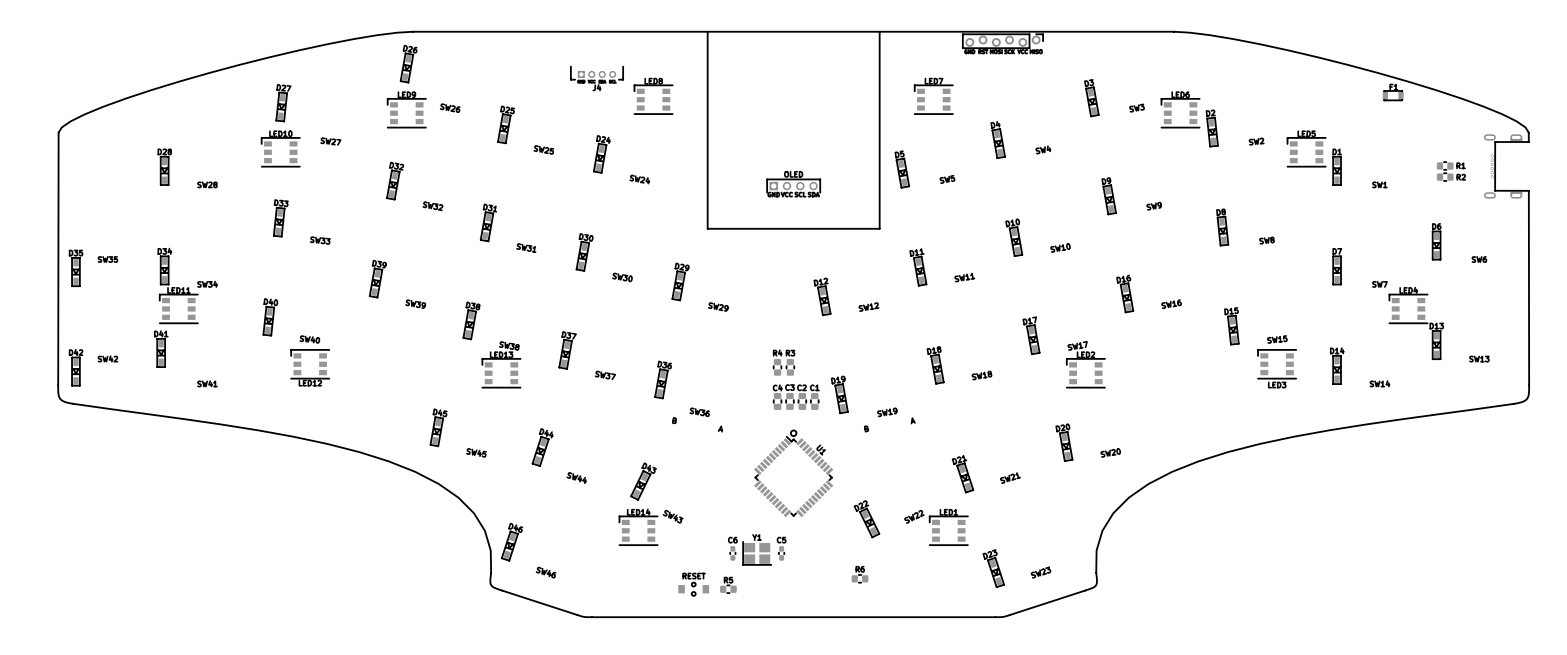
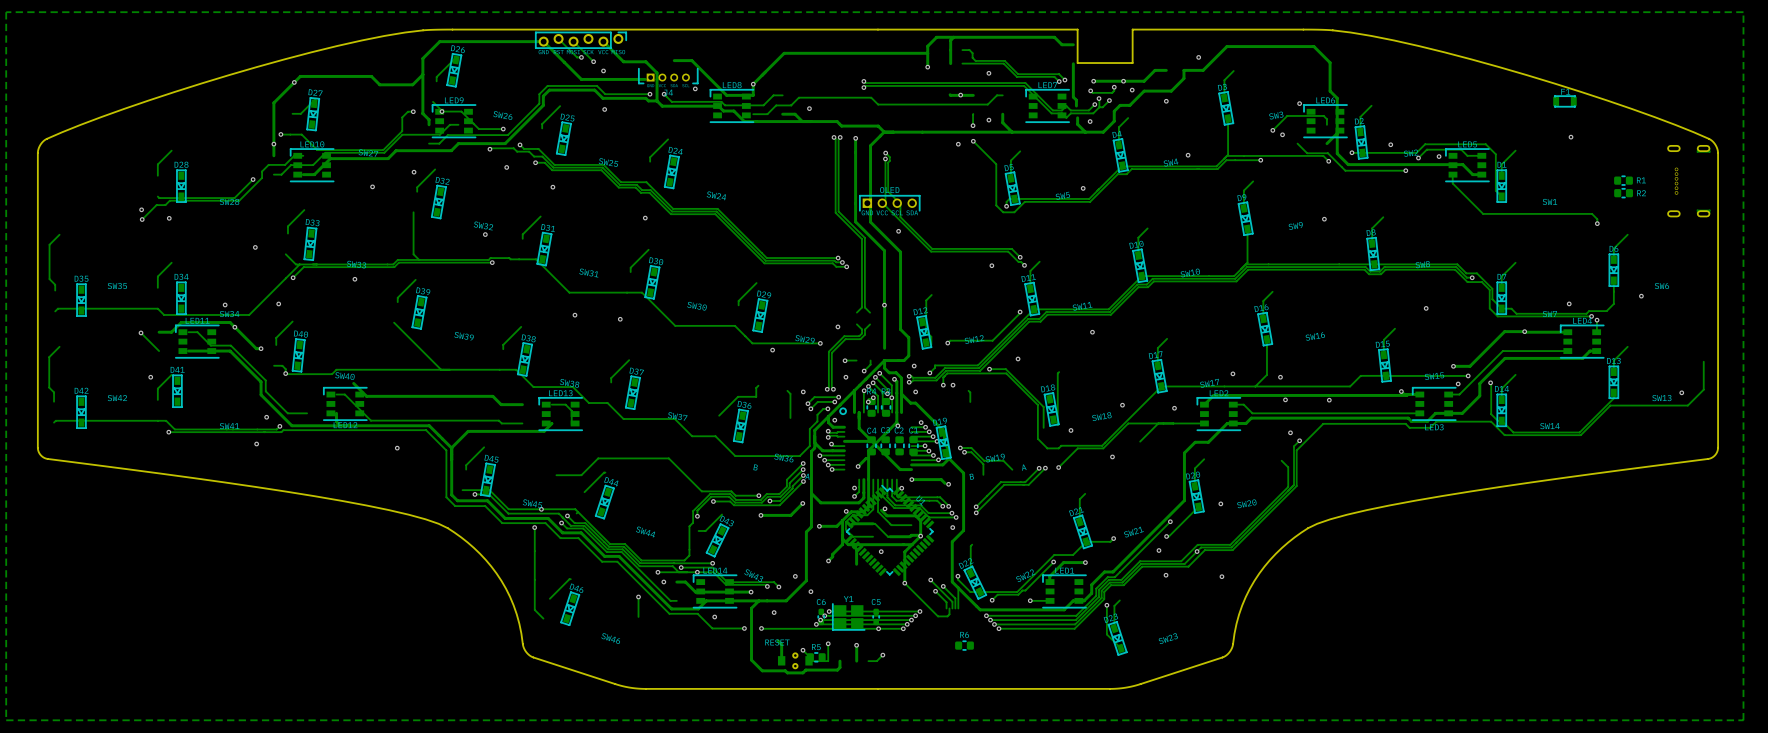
zone outline: none -> (1743, 12) (1743, 720) (6, 720) (6, 12) (1743, 12)
board edge: (879, 31) (879, 228) (707, 228) (707, 31) -> none
board edge: (1174, 31) (413, 31) (377, 35) (299, 50) (151, 89) (85, 114) (61, 127) (58, 132) (58, 396) (63, 401) (70, 403) (293, 436) (359, 452) (415, 471) (438, 483) (458, 497) (474, 513) (484, 530) (490, 550) (490, 582) (492, 586) (580, 616) (590, 617) (1004, 616) (1094, 586) (1096, 582) (1096, 550) (1102, 530) (1113, 513) (1128, 497) (1148, 483) (1171, 471) (1228, 452) (1294, 436) (1513, 403) (1526, 399) (1529, 389) (1528, 190) (1495, 190) (1495, 142) (1528, 142) (1528, 132) (1525, 127) (1516, 121) (1483, 106) (1378, 73) (1259, 44) (1209, 35) (1174, 31) -> (1303, 29) (1332, 30) (1371, 35) (1471, 59) (1607, 100) (1675, 124) (1713, 142) (1718, 153) (1718, 447) (1714, 455) (1708, 458) (1441, 496) (1366, 510) (1317, 523) (1288, 542) (1259, 573) (1242, 605) (1232, 646) (1227, 654) (1131, 686) (1110, 688) (645, 688) (619, 685) (529, 655) (523, 647) (513, 605) (496, 573) (467, 542) (438, 523) (388, 510) (314, 496) (46, 458) (41, 455) (38, 450) (38, 148) (46, 138) (148, 100) (229, 75) (311, 52) (384, 35) (426, 30) (1077, 29) (1077, 63) (1132, 63) (1132, 29) (1303, 29)
track: none -> (953, 37) (950, 40) (950, 63)
track: none -> (558, 38) (577, 57) (581, 57)
part: none -> (581, 40)
part: (1002, 41) -> none
track: none -> (573, 41) (593, 61)
track: none -> (603, 41) (623, 61) (645, 61) (657, 72) (657, 100)
track: none -> (1073, 44) (1061, 44) (1054, 37) (936, 37) (927, 46) (927, 67)
track: none -> (962, 50) (969, 50) (975, 60) (1004, 60) (1018, 74) (1059, 74) (1064, 80)
track: none -> (927, 53) (784, 53) (753, 84) (753, 95) (726, 95) (691, 60) (674, 60)
via: none -> (581, 57)
via: none -> (1198, 57)
track: none -> (454, 59) (436, 77) (436, 81)
via: none -> (593, 61)
track: none -> (962, 63) (1003, 63) (1016, 76) (1054, 76) (1059, 81)
track: none -> (1073, 63) (1073, 97) (1076, 100) (1076, 106)
via: none -> (927, 67)
via: none -> (603, 70)
track: none -> (1166, 70) (1155, 70) (1144, 81) (1093, 81)
track: none -> (1233, 71) (1224, 80) (1224, 98)
via: none -> (988, 73)
track: none -> (422, 74) (412, 84) (379, 84) (371, 76) (300, 76) (273, 102) (273, 155)
track: none -> (645, 79) (581, 79) (543, 41) (439, 41) (422, 58) (422, 113) (429, 119) (429, 124)
via: none -> (1064, 80)
track: none -> (863, 81) (865, 83) (1025, 83) (1052, 110) (1062, 110) (1066, 106) (1070, 110) (1088, 110) (1094, 104)
via: none -> (863, 81)
via: none -> (1093, 81)
via: none -> (1123, 81)
via: none -> (294, 82)
via: none -> (1059, 81)
via: none -> (753, 84)
track: none -> (863, 87) (865, 85) (1024, 85) (1051, 113) (1062, 113) (1066, 117) (1070, 113) (1093, 113) (1099, 107)
via: none -> (863, 87)
track: none -> (1114, 87) (1112, 92) (1092, 92) (1090, 90)
via: none -> (1114, 87)
via: none -> (695, 88)
via: none -> (1132, 90)
via: none -> (1090, 90)
track: none -> (650, 94) (605, 94) (597, 85) (547, 85) (539, 94) (539, 103) (507, 135) (447, 135) (439, 143) (429, 143)
via: none -> (650, 94)
track: none -> (664, 94) (671, 101) (721, 101) (725, 105) (763, 105) (773, 95) (782, 95)
via: none -> (664, 94)
track: none -> (950, 94) (973, 95)
via: none -> (960, 95)
track: none -> (1002, 95) (997, 95) (987, 104) (878, 104) (871, 97) (798, 97) (791, 105) (776, 105) (767, 114) (753, 114)
track: none -> (316, 98) (300, 113) (292, 113)
track: none -> (1099, 98) (1099, 107)
via: none -> (1099, 98)
track: none -> (1109, 100) (1102, 107) (1099, 107)
via: none -> (1109, 100)
track: none -> (657, 100) (662, 106) (718, 106) (723, 111) (733, 111) (744, 121) (837, 121) (841, 126) (878, 126) (884, 132)
track: none -> (657, 100) (648, 100) (645, 98) (602, 98) (594, 90) (549, 90) (543, 96) (543, 105) (505, 143) (458, 143) (451, 150) (396, 150) (388, 158) (330, 158) (314, 174) (303, 174)
via: none -> (1166, 101)
track: none -> (433, 101) (441, 111) (461, 111) (478, 129) (503, 129)
via: none -> (1299, 103)
via: none -> (1094, 104)
track: none -> (560, 106) (542, 124) (542, 128)
track: none -> (1371, 105) (1360, 116) (1360, 132)
via: none -> (604, 109)
via: none -> (809, 108)
track: none -> (413, 111) (407, 111) (402, 117) (402, 131) (383, 150) (317, 150) (301, 134) (280, 134)
via: none -> (413, 111)
via: none -> (441, 111)
track: none -> (782, 114) (795, 114) (802, 121)
track: none -> (973, 114) (973, 125)
track: none -> (1002, 114) (1002, 122) (1012, 132)
track: none -> (1077, 117) (1077, 124) (1085, 132)
track: none -> (1128, 118) (1118, 127) (1118, 145)
track: none -> (1228, 118) (1228, 154) (1216, 166) (1122, 165) (1089, 198) (1009, 198) (1006, 201) (1006, 206)
via: none -> (988, 120)
via: none -> (1090, 121)
track: none -> (458, 124) (449, 124) (439, 134) (402, 134) (384, 152) (325, 152) (313, 165) (291, 165) (281, 174) (273, 174)
track: none -> (1326, 124) (1326, 119) (1323, 115) (1287, 115) (1272, 130)
via: none -> (973, 125)
via: none -> (503, 129)
via: none -> (1272, 130)
track: none -> (1337, 133) (1326, 143)
via: none -> (280, 134)
via: none -> (1282, 134)
track: none -> (834, 137) (835, 139) (835, 212) (861, 239) (861, 307) (856, 312)
via: none -> (834, 137)
track: none -> (840, 137) (838, 139) (838, 211) (864, 237) (864, 307) (870, 312)
via: none -> (840, 137)
via: none -> (1571, 137)
track: none -> (855, 138) (855, 221) (884, 250) (884, 348)
via: none -> (855, 138)
track: none -> (668, 139) (650, 157) (650, 161)
track: none -> (973, 141) (996, 164) (996, 205) (1003, 212) (1014, 212) (1024, 201) (1090, 201) (1117, 174) (1126, 174) (1131, 169) (1217, 169) (1226, 160) (1260, 160)
via: none -> (973, 141)
via: none -> (273, 144)
via: none -> (958, 144)
track: none -> (1297, 143) (1307, 153) (1327, 153) (1345, 170) (1405, 170)
track: none -> (520, 144) (524, 148) (538, 148) (554, 164) (603, 164) (621, 182) (646, 182) (673, 208) (717, 208) (766, 258) (838, 258)
via: none -> (520, 144)
via: none -> (1390, 144)
track: none -> (489, 149) (513, 148) (517, 151) (529, 151) (534, 156) (542, 156) (553, 167) (602, 167) (619, 184) (636, 184) (642, 190) (650, 190) (672, 211) (716, 211) (765, 260) (834, 260) (842, 262)
via: none -> (489, 149)
track: none -> (171, 150) (157, 164) (157, 175)
track: none -> (1020, 151) (1010, 160) (1010, 178)
track: none -> (1515, 150) (1501, 164) (1501, 175)
track: none -> (885, 153) (889, 157) (888, 191) (900, 203) (900, 217) (932, 248) (1011, 248) (1020, 257)
via: none -> (885, 153)
track: none -> (1351, 152) (1416, 152) (1425, 144) (1485, 144) (1495, 154) (1495, 190) (1501, 196)
via: none -> (1351, 152)
track: none -> (303, 155) (294, 155) (285, 164) (268, 164) (262, 171) (262, 177) (239, 200) (169, 200) (165, 205) (156, 205) (142, 219)
via: none -> (1188, 155)
track: none -> (1482, 155) (1467, 155) (1461, 149) (1426, 149) (1418, 158)
track: none -> (1226, 155) (1323, 155) (1328, 161)
via: none -> (1439, 156)
via: none -> (1418, 158)
track: none -> (885, 158) (885, 205) (931, 251) (1008, 251) (1024, 265)
via: none -> (885, 158)
via: none -> (1260, 160)
via: none -> (1328, 161)
track: none -> (535, 162) (544, 162) (552, 170) (601, 170) (618, 187) (635, 187) (640, 192) (649, 192) (670, 214) (715, 214) (764, 263) (832, 263) (836, 266) (846, 266)
via: none -> (535, 162)
via: none -> (506, 167)
track: none -> (435, 169) (417, 187) (417, 191)
via: none -> (1405, 170)
via: none -> (414, 172)
track: none -> (1452, 174) (1452, 183) (1483, 213) (1592, 213) (1597, 219) (1597, 223)
track: none -> (1482, 174) (1472, 174) (1462, 164) (1348, 164) (1337, 153) (1337, 98) (1330, 91) (1330, 62) (1313, 46) (1226, 46) (1203, 70) (1183, 70) (1183, 78) (1171, 91) (1144, 91) (1129, 105) (1120, 105) (1114, 111) (1114, 121) (1103, 132) (884, 132) (870, 145) (870, 222) (900, 252) (900, 329) (908, 337) (908, 355) (904, 360) (884, 360)
track: none -> (253, 179) (234, 198) (157, 196)
via: none -> (253, 179)
track: none -> (1253, 181) (1243, 190) (1243, 208)
via: none -> (372, 186)
via: none -> (552, 187)
via: none -> (1083, 188)
via: none -> (1006, 206)
via: none -> (141, 209)
track: none -> (304, 210) (287, 226) (287, 233)
track: none -> (413, 212) (413, 254) (419, 259)
track: none -> (540, 216) (522, 234) (522, 238)
track: none -> (1383, 217) (1372, 228) (1372, 243)
via: none -> (169, 218)
via: none -> (645, 218)
via: none -> (142, 219)
via: none -> (1324, 219)
via: none -> (1597, 223)
track: none -> (1147, 228) (1138, 237) (1138, 255)
track: none -> (1247, 229) (1247, 262) (1234, 276) (1141, 276) (1108, 309) (1034, 309) (977, 365) (934, 365) (929, 372)
via: none -> (898, 231)
via: none -> (485, 234)
track: none -> (59, 234) (49, 244) (49, 279) (55, 284) (55, 290)
track: none -> (1627, 234) (1613, 248) (1613, 259)
via: none -> (255, 247)
track: none -> (648, 249) (630, 267) (630, 272)
track: none -> (285, 254) (295, 264) (393, 264) (397, 259) (536, 259) (569, 292) (642, 292) (675, 325) (735, 325) (752, 343) (820, 343)
via: none -> (838, 258)
via: none -> (1020, 257)
track: none -> (1039, 261) (1030, 270) (1030, 288)
track: none -> (171, 262) (157, 276) (157, 287)
track: none -> (492, 262) (398, 262) (394, 267) (303, 267) (293, 277)
via: none -> (492, 262)
via: none -> (842, 262)
track: none -> (1515, 262) (1501, 276) (1501, 287)
track: none -> (299, 264) (249, 314) (164, 314) (157, 308) (57, 308) (55, 311)
track: none -> (1245, 264) (1457, 264) (1466, 273) (1476, 273) (1492, 288) (1492, 299) (1501, 308) (1511, 308) (1516, 313) (1586, 313) (1589, 311) (1606, 311) (1613, 303) (1613, 280)
via: none -> (991, 265)
via: none -> (1024, 265)
via: none -> (846, 266)
via: none -> (293, 277)
track: none -> (1472, 277) (1466, 277) (1456, 267) (1384, 267) (1379, 271) (1370, 271) (1365, 267) (1247, 267) (1235, 278) (1152, 278) (1146, 284) (1137, 284) (1109, 312) (1046, 312) (1039, 318) (1028, 318) (979, 368) (945, 368) (935, 377) (909, 376)
via: none -> (1472, 277)
via: none -> (354, 279)
track: none -> (415, 279) (397, 297) (397, 302)
track: none -> (756, 283) (738, 301) (738, 305)
track: none -> (1272, 291) (1263, 301) (1263, 318)
track: none -> (931, 294) (926, 300) (926, 331) (931, 336) (931, 344)
via: none -> (1641, 296)
via: none -> (278, 303)
via: none -> (1569, 303)
via: none -> (225, 304)
via: none -> (884, 305)
via: none -> (1426, 308)
track: none -> (1020, 311) (992, 340) (950, 340) (947, 343)
via: none -> (1020, 311)
via: none -> (574, 315)
track: none -> (1591, 316) (1497, 316) (1489, 308) (1489, 289) (1481, 282) (1467, 282) (1455, 269) (1385, 269) (1381, 274) (1369, 274) (1364, 269) (1248, 269) (1236, 281) (1153, 281) (1148, 287) (1138, 287) (1110, 314) (1047, 314) (1040, 321) (1029, 321) (980, 370) (946, 370) (936, 380) (913, 380) (909, 382)
via: none -> (1591, 316)
via: none -> (620, 319)
track: none -> (1597, 320) (1596, 332)
via: none -> (1597, 320)
track: none -> (292, 321) (276, 337) (276, 345)
track: none -> (394, 322) (441, 369)
track: none -> (856, 324) (862, 329) (862, 333) (859, 336) (844, 336) (828, 351) (828, 387) (827, 389)
track: none -> (870, 324) (860, 339) (845, 339) (831, 352) (831, 387) (833, 389)
track: none -> (521, 326) (503, 344) (503, 349)
via: none -> (837, 326)
via: none -> (234, 327)
track: none -> (1395, 328) (1383, 339) (1383, 355)
track: none -> (159, 332) (171, 332) (181, 322) (230, 322) (256, 348) (261, 348)
track: none -> (188, 332) (197, 332) (210, 345) (230, 345) (265, 380) (265, 391) (287, 413) (307, 413)
via: none -> (1092, 332)
via: none -> (1524, 331)
track: none -> (1567, 332) (1504, 331) (1469, 366) (1453, 366)
track: none -> (141, 332) (159, 351)
via: none -> (141, 332)
track: none -> (1167, 338) (1157, 348) (1157, 365)
track: none -> (1266, 339) (1266, 374) (1255, 386)
via: none -> (820, 343)
via: none -> (947, 343)
track: none -> (59, 346) (49, 357) (49, 387) (54, 392) (54, 401)
track: none -> (1627, 346) (1613, 360) (1613, 371)
via: none -> (261, 348)
via: none -> (772, 350)
track: none -> (188, 351) (230, 351) (261, 381) (261, 394) (291, 425) (429, 425) (451, 448)
track: none -> (1567, 351) (1502, 351) (1459, 394) (1448, 394)
track: none -> (1596, 351) (1589, 351) (1582, 358) (1504, 358) (1479, 383) (1479, 395) (1462, 413) (1435, 413) (1427, 421) (1411, 421) (1408, 418) (1251, 418) (1246, 423) (1227, 423) (1208, 442) (1195, 442) (1184, 453) (1184, 500) (1113, 571) (1104, 571) (1091, 584) (1091, 593) (1084, 600) (1073, 600) (1064, 609) (980, 609) (952, 581) (952, 541) (963, 530) (963, 473) (948, 457)
via: none -> (1018, 358)
track: none -> (629, 360) (611, 378) (611, 382)
via: none -> (845, 360)
track: none -> (856, 360) (845, 360)
track: none -> (870, 360) (870, 364) (864, 371)
track: none -> (884, 360) (814, 430) (814, 448) (811, 451) (811, 526) (806, 531) (806, 580) (786, 600) (706, 600) (698, 608) (671, 608) (619, 556) (604, 556) (581, 532) (562, 532) (548, 518) (505, 518) (487, 500) (457, 500) (451, 494) (451, 447) (468, 431) (544, 431) (551, 423)
track: none -> (884, 360) (884, 368) (889, 372) (896, 372) (901, 378) (901, 412)
track: none -> (1703, 361) (1703, 389) (1687, 405) (1610, 405) (1580, 435) (1504, 435) (1491, 421) (1436, 421) (1430, 427) (1409, 427) (1405, 423) (1323, 423) (1296, 450) (1296, 486) (1232, 550) (1204, 550) (1188, 566) (1142, 566) (1123, 585) (1111, 585) (1104, 591) (1104, 599) (1074, 628) (998, 628)
track: none -> (274, 365) (282, 365) (285, 369) (286, 374) (332, 374) (336, 369) (516, 369) (533, 387) (572, 387) (588, 403) (607, 403) (623, 419) (674, 419) (692, 436) (715, 436) (735, 456) (799, 456) (809, 446) (809, 429) (817, 421) (817, 414) (823, 408) (827, 408)
via: none -> (914, 366)
via: none -> (1453, 366)
track: none -> (989, 369) (1005, 369) (1043, 406) (1043, 427)
via: none -> (989, 369)
via: none -> (864, 371)
via: none -> (929, 372)
track: none -> (1059, 372) (1057, 425)
via: none -> (285, 373)
track: none -> (879, 373) (891, 385) (892, 412)
via: none -> (879, 373)
via: none -> (1232, 373)
track: none -> (171, 374) (157, 388) (157, 399)
track: none -> (1515, 374) (1501, 388) (1501, 399)
via: none -> (909, 376)
track: none -> (1468, 375) (1360, 375) (1350, 386) (1161, 386) (1102, 445) (1061, 445) (1058, 448) (1047, 448) (1037, 438) (1037, 405) (1006, 373) (947, 373) (943, 377)
via: none -> (1468, 375)
via: none -> (150, 377)
via: none -> (845, 377)
track: none -> (875, 377) (887, 389) (887, 393)
via: none -> (875, 377)
track: none -> (943, 377) (943, 385)
via: none -> (1280, 377)
track: none -> (894, 379) (896, 381) (896, 423)
via: none -> (894, 379)
via: none -> (909, 382)
track: none -> (873, 382) (882, 392) (882, 412)
via: none -> (873, 382)
track: none -> (1490, 382) (1491, 414) (1497, 420) (1501, 420) (1513, 432) (1579, 432) (1613, 398) (1613, 392)
via: none -> (1490, 382)
track: none -> (353, 383) (366, 396) (492, 396) (501, 404) (522, 404)
via: none -> (1458, 383)
via: none -> (943, 385)
via: none -> (953, 385)
track: none -> (758, 385) (756, 387) (756, 396) (738, 396) (719, 415)
track: none -> (868, 386) (878, 396) (878, 412)
via: none -> (868, 386)
via: none -> (827, 389)
via: none -> (833, 389)
track: none -> (787, 390) (790, 393) (790, 418)
track: none -> (854, 390) (854, 412)
track: none -> (864, 390) (863, 412)
via: none -> (864, 390)
track: none -> (968, 390) (970, 401)
via: none -> (803, 391)
via: none -> (915, 391)
track: none -> (1401, 391) (1404, 394) (1419, 394)
via: none -> (1401, 391)
via: none -> (1681, 392)
track: none -> (336, 394) (344, 394) (370, 420) (498, 420) (501, 423) (522, 423)
via: none -> (887, 393)
track: none -> (901, 393) (910, 403) (915, 403) (944, 431) (944, 444) (948, 447) (948, 459) (942, 464) (911, 464)
track: none -> (1407, 394) (1213, 395) (1204, 404)
track: none -> (838, 397) (814, 397) (808, 403)
via: none -> (838, 397)
via: none -> (873, 397)
via: none -> (891, 397)
via: none -> (1285, 399)
via: none -> (1329, 400)
track: none -> (834, 401) (817, 401) (810, 408)
via: none -> (834, 401)
via: none -> (868, 401)
track: none -> (551, 404) (565, 404) (571, 410) (571, 424)
via: none -> (807, 403)
track: none -> (1233, 404) (1243, 404) (1252, 413) (1419, 413)
via: none -> (1122, 405)
drawing: none -> [839, 407, 847, 415]
via: none -> (810, 408)
via: none -> (827, 408)
via: none -> (1174, 408)
track: none -> (859, 412) (859, 428) (900, 469) (911, 469)
track: none -> (336, 413) (336, 421) (340, 425)
track: none -> (828, 416) (828, 422) (833, 427) (844, 427)
via: none -> (266, 417)
via: none -> (834, 420)
track: none -> (54, 422) (55, 420) (166, 420) (174, 429) (276, 429) (279, 426)
via: none -> (921, 422)
track: none -> (1158, 423) (1140, 441)
track: none -> (1204, 423) (1128, 423) (1103, 448) (1077, 448) (1058, 467)
track: none -> (897, 425) (896, 422) (868, 450) (868, 507) (863, 511) (851, 511) (836, 526) (819, 526)
via: none -> (897, 425)
via: none -> (279, 426)
track: none -> (925, 427) (911, 427)
via: none -> (925, 427)
via: none -> (1071, 430)
track: none -> (828, 431) (829, 432) (844, 431)
via: none -> (828, 431)
track: none -> (168, 432) (426, 430) (446, 450) (446, 497) (455, 506) (485, 506) (502, 523) (545, 523) (560, 538) (578, 538) (602, 561) (617, 561) (669, 613) (697, 613) (712, 628) (744, 628)
via: none -> (168, 432)
track: none -> (929, 431) (911, 431)
via: none -> (929, 431)
via: none -> (1290, 432)
via: none -> (828, 437)
track: none -> (844, 436) (829, 435) (828, 437)
track: none -> (933, 436) (911, 436)
via: none -> (933, 436)
track: none -> (1299, 440) (1294, 446) (1294, 484) (1231, 547) (1201, 547) (1184, 563) (1141, 563) (1122, 582) (1109, 582) (1101, 590) (1101, 598) (1075, 624) (994, 624)
via: none -> (1299, 440)
track: none -> (872, 441) (844, 441)
track: none -> (936, 441) (911, 441)
via: none -> (937, 441)
track: none -> (814, 442) (822, 450) (844, 450)
via: none -> (256, 444)
track: none -> (831, 444) (833, 446) (844, 446)
via: none -> (831, 444)
track: none -> (925, 445) (911, 446)
via: none -> (925, 445)
track: none -> (484, 447) (466, 465) (466, 469)
via: none -> (397, 448)
track: none -> (960, 448) (971, 448) (984, 460) (1003, 460) (1012, 469)
via: none -> (960, 448)
track: none -> (911, 450) (928, 450)
via: none -> (928, 450)
track: none -> (964, 452) (971, 452) (983, 464) (983, 474)
via: none -> (964, 452)
via: none -> (819, 455)
track: none -> (844, 455) (819, 455)
track: none -> (933, 455) (911, 455)
via: none -> (933, 455)
via: none -> (1112, 456)
track: none -> (868, 458) (858, 466)
track: none -> (938, 459) (911, 460)
via: none -> (938, 459)
track: none -> (1204, 459) (1194, 468) (1194, 486)
via: none -> (824, 460)
track: none -> (844, 460) (824, 460)
track: none -> (1281, 460) (1288, 467) (1288, 486) (1230, 544) (1197, 544) (1181, 561) (1140, 561) (1121, 579) (1108, 579) (1098, 589) (1098, 596) (1075, 620) (990, 620)
track: none -> (803, 463) (786, 479) (786, 486) (779, 494) (766, 494) (760, 499) (736, 499) (730, 494) (710, 494) (693, 511) (693, 522) (689, 526) (689, 555) (684, 560) (641, 560) (624, 544) (610, 544) (575, 509) (508, 509) (489, 490) (462, 490)
via: none -> (803, 463)
via: none -> (828, 465)
track: none -> (844, 464) (828, 465)
via: none -> (858, 466)
via: none -> (1058, 467)
track: none -> (1039, 468) (1025, 482) (1000, 482) (976, 506)
via: none -> (1039, 468)
track: none -> (1045, 468) (1028, 484) (1004, 484) (976, 512)
via: none -> (1045, 468)
track: none -> (803, 469) (789, 483) (789, 487) (780, 496) (767, 496) (761, 502) (735, 502) (729, 496) (711, 496) (697, 510) (697, 516)
via: none -> (803, 469)
track: none -> (832, 469) (844, 469)
via: none -> (832, 469)
track: none -> (605, 472) (584, 492)
track: none -> (556, 475) (581, 475) (598, 458) (668, 458) (701, 491) (731, 491) (735, 495) (758, 495)
track: none -> (803, 475) (780, 501) (769, 501)
via: none -> (803, 475)
drawing: [790, 430, 797, 437] -> none
track: none -> (859, 479) (859, 491) (854, 496)
track: none -> (863, 479) (863, 497) (859, 502) (820, 502) (811, 493)
track: none -> (873, 479) (873, 509) (867, 515) (852, 515) (845, 521) (845, 529) (853, 536) (873, 536)
track: none -> (878, 479) (878, 511) (891, 525) (911, 525)
track: none -> (882, 479) (882, 496) (894, 508) (919, 508) (929, 517) (956, 517)
track: none -> (887, 479) (887, 497) (895, 505) (920, 505) (928, 513) (951, 513)
track: none -> (892, 479) (892, 496) (896, 500) (937, 500) (942, 506)
track: none -> (896, 479) (896, 495) (899, 497) (940, 497) (948, 506)
track: none -> (911, 479) (941, 479) (945, 483)
via: none -> (911, 479)
track: none -> (803, 481) (779, 505) (733, 505) (730, 501) (713, 501)
via: none -> (803, 481)
via: none -> (948, 484)
via: none -> (854, 488)
via: none -> (901, 488)
track: none -> (474, 494) (489, 494) (508, 513) (558, 513) (571, 525) (584, 525) (607, 549) (622, 549) (639, 566) (672, 566) (678, 572)
via: none -> (474, 494)
track: none -> (1085, 493) (1079, 499) (1079, 521)
via: none -> (758, 495)
via: none -> (854, 496)
via: none -> (713, 501)
via: none -> (769, 501)
track: none -> (802, 503) (790, 515) (760, 515)
via: none -> (802, 503)
via: none -> (1220, 503)
via: none -> (942, 506)
via: none -> (948, 506)
via: none -> (976, 506)
track: none -> (1198, 506) (1168, 536) (1166, 536)
via: none -> (541, 509)
via: none -> (885, 508)
track: none -> (881, 510) (886, 515) (915, 515) (920, 520) (920, 536)
via: none -> (846, 511)
track: none -> (578, 512) (576, 513)
via: none -> (976, 512)
via: none -> (951, 513)
track: none -> (722, 514) (705, 530) (698, 530)
track: none -> (567, 515) (574, 523) (585, 523) (608, 546) (623, 546) (640, 563) (712, 563)
via: none -> (567, 515)
via: none -> (760, 515)
via: none -> (697, 516)
via: none -> (956, 517)
track: none -> (842, 520) (842, 544) (828, 560)
track: none -> (1170, 521) (1114, 577) (1107, 577) (1096, 588) (1096, 595) (1076, 615) (986, 615)
via: none -> (1170, 521)
track: none -> (561, 523) (567, 528) (583, 528) (606, 552) (621, 552) (670, 600) (676, 600)
via: none -> (561, 523)
track: none -> (851, 525) (875, 523) (887, 536) (920, 536)
via: none -> (819, 526)
track: none -> (534, 527) (534, 609) (543, 618)
via: none -> (534, 527)
via: none -> (952, 527)
track: none -> (920, 536) (904, 551) (904, 583) (938, 616) (947, 616) (949, 608)
via: none -> (920, 536)
via: none -> (1166, 536)
track: none -> (1113, 538) (1110, 541) (1086, 541)
via: none -> (1113, 538)
track: none -> (842, 538) (848, 544) (912, 544)
track: none -> (1086, 541) (1073, 555) (1054, 555) (1017, 592) (970, 592) (957, 579) (957, 576)
track: none -> (852, 544) (856, 549) (856, 564)
track: none -> (972, 544) (970, 573)
via: none -> (1158, 550)
via: none -> (881, 551)
via: none -> (1197, 551)
via: none -> (828, 560)
track: none -> (1053, 561) (1025, 590) (1018, 594) (997, 594) (992, 600)
via: none -> (1053, 561)
via: none -> (712, 563)
track: none -> (1085, 562) (1063, 562) (1049, 576) (1049, 582)
via: none -> (1085, 562)
track: none -> (681, 567) (712, 567) (727, 582) (774, 582) (778, 586)
via: none -> (681, 567)
track: none -> (657, 572) (713, 572) (726, 584) (765, 584) (767, 586)
via: none -> (657, 572)
via: none -> (697, 572)
via: none -> (1166, 575)
via: none -> (795, 576)
via: none -> (957, 576)
via: none -> (1221, 576)
track: none -> (570, 579) (549, 598)
track: none -> (930, 580) (952, 601) (952, 608)
via: none -> (930, 580)
via: none -> (663, 581)
track: none -> (676, 582) (685, 582) (695, 592) (751, 592)
via: none -> (904, 583)
via: none -> (767, 586)
via: none -> (778, 586)
track: none -> (943, 586) (955, 598) (955, 608)
via: none -> (943, 586)
track: none -> (958, 587) (958, 608)
via: none -> (810, 591)
track: none -> (935, 591) (946, 602) (946, 608)
via: none -> (935, 591)
via: none -> (751, 592)
track: none -> (638, 596) (638, 616)
via: none -> (638, 596)
via: none -> (992, 600)
track: none -> (1119, 600) (1114, 605) (1114, 628)
track: none -> (758, 600) (751, 608) (751, 660) (762, 670) (802, 672) (805, 670) (837, 670) (839, 667) (839, 661)
track: none -> (1030, 600) (1049, 600)
via: none -> (1030, 600)
track: none -> (1106, 605) (1106, 634) (1120, 648)
via: none -> (1106, 605)
via: none -> (829, 611)
track: none -> (919, 611) (829, 611)
via: none -> (919, 611)
via: none -> (774, 612)
via: none -> (824, 615)
track: none -> (915, 615) (824, 615)
via: none -> (915, 615)
via: none -> (986, 615)
via: none -> (714, 617)
via: none -> (820, 620)
track: none -> (911, 620) (820, 620)
via: none -> (911, 620)
via: none -> (990, 620)
via: none -> (816, 624)
track: none -> (907, 624) (816, 624)
via: none -> (907, 624)
via: none -> (994, 624)
via: none -> (744, 628)
track: none -> (761, 628) (903, 628)
via: none -> (761, 628)
via: none -> (878, 628)
via: none -> (903, 628)
via: none -> (998, 628)
track: none -> (777, 640) (781, 644) (781, 660)
track: none -> (828, 643) (828, 661) (809, 661) (809, 656) (802, 650)
via: none -> (828, 643)
track: none -> (856, 645) (856, 661)
via: none -> (856, 645)
via: none -> (802, 650)
track: none -> (882, 655) (876, 661) (868, 661)
via: none -> (882, 655)
part position: (693, 589) -> (795, 660)

